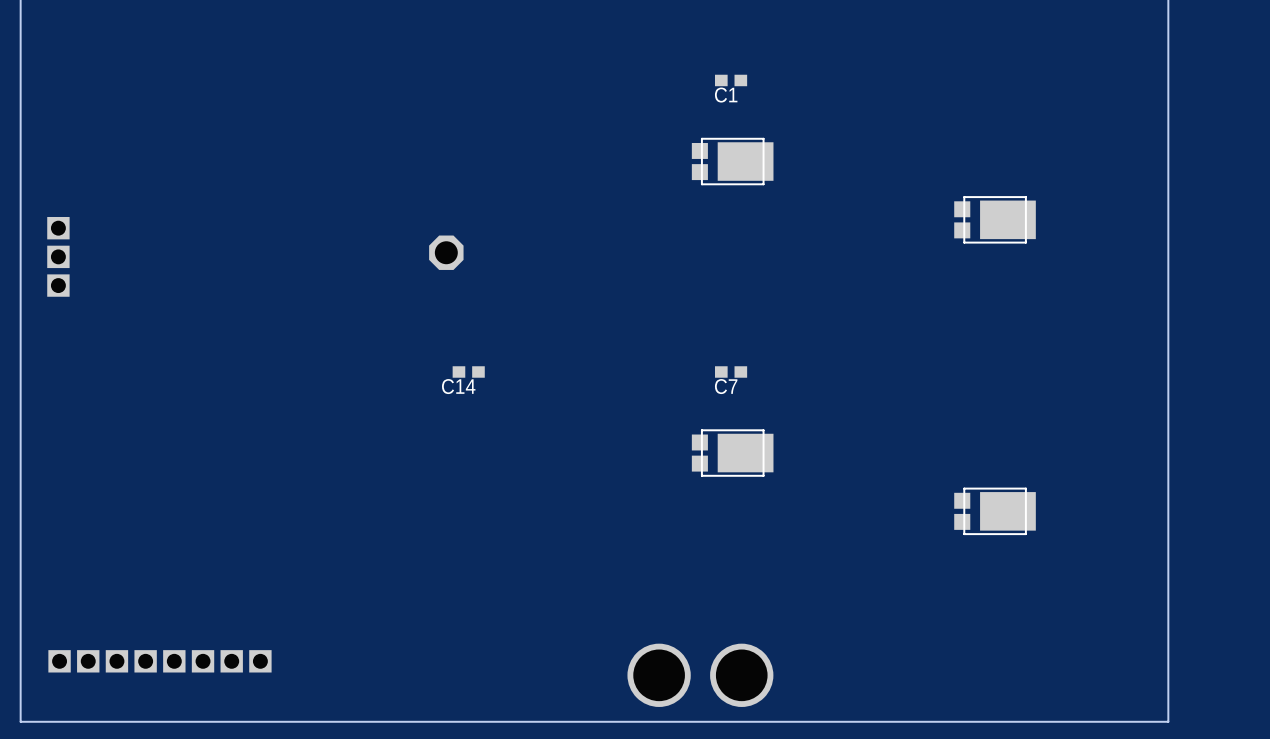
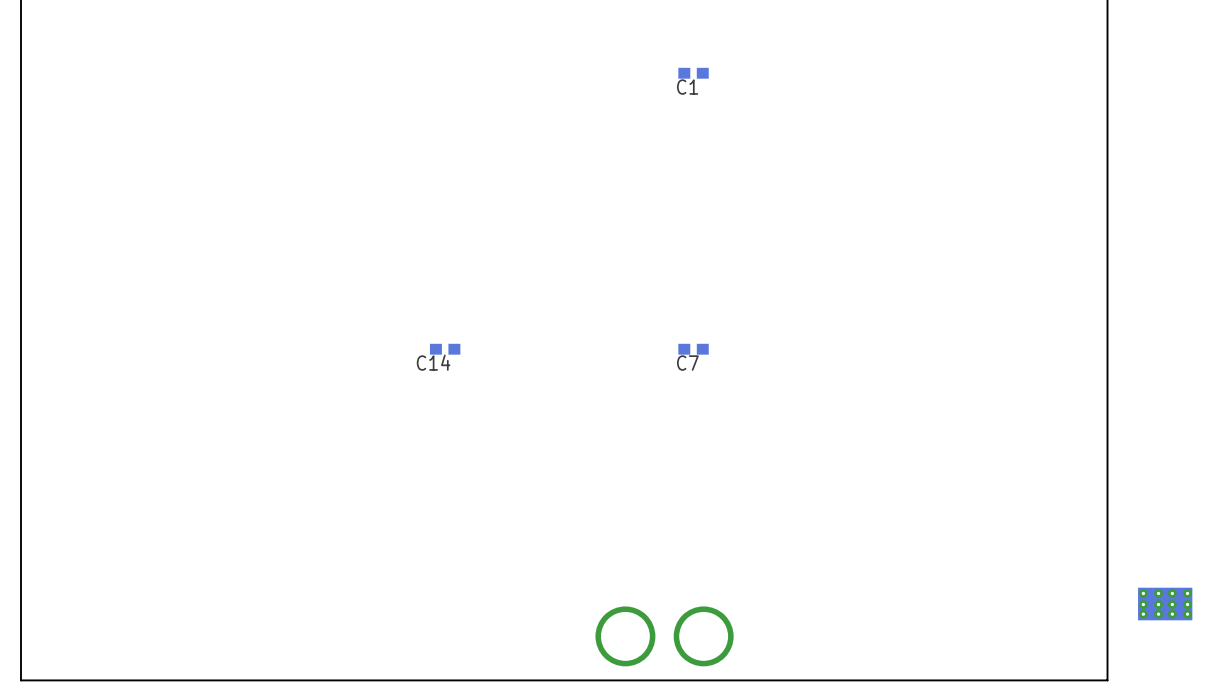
part: (732, 161) -> none
part: (995, 219) -> none
part: (446, 252) -> none
part: (58, 256) -> none
part: (732, 453) -> none
part: (995, 511) -> none
part: none -> (1165, 604)
part: (159, 661) -> none

